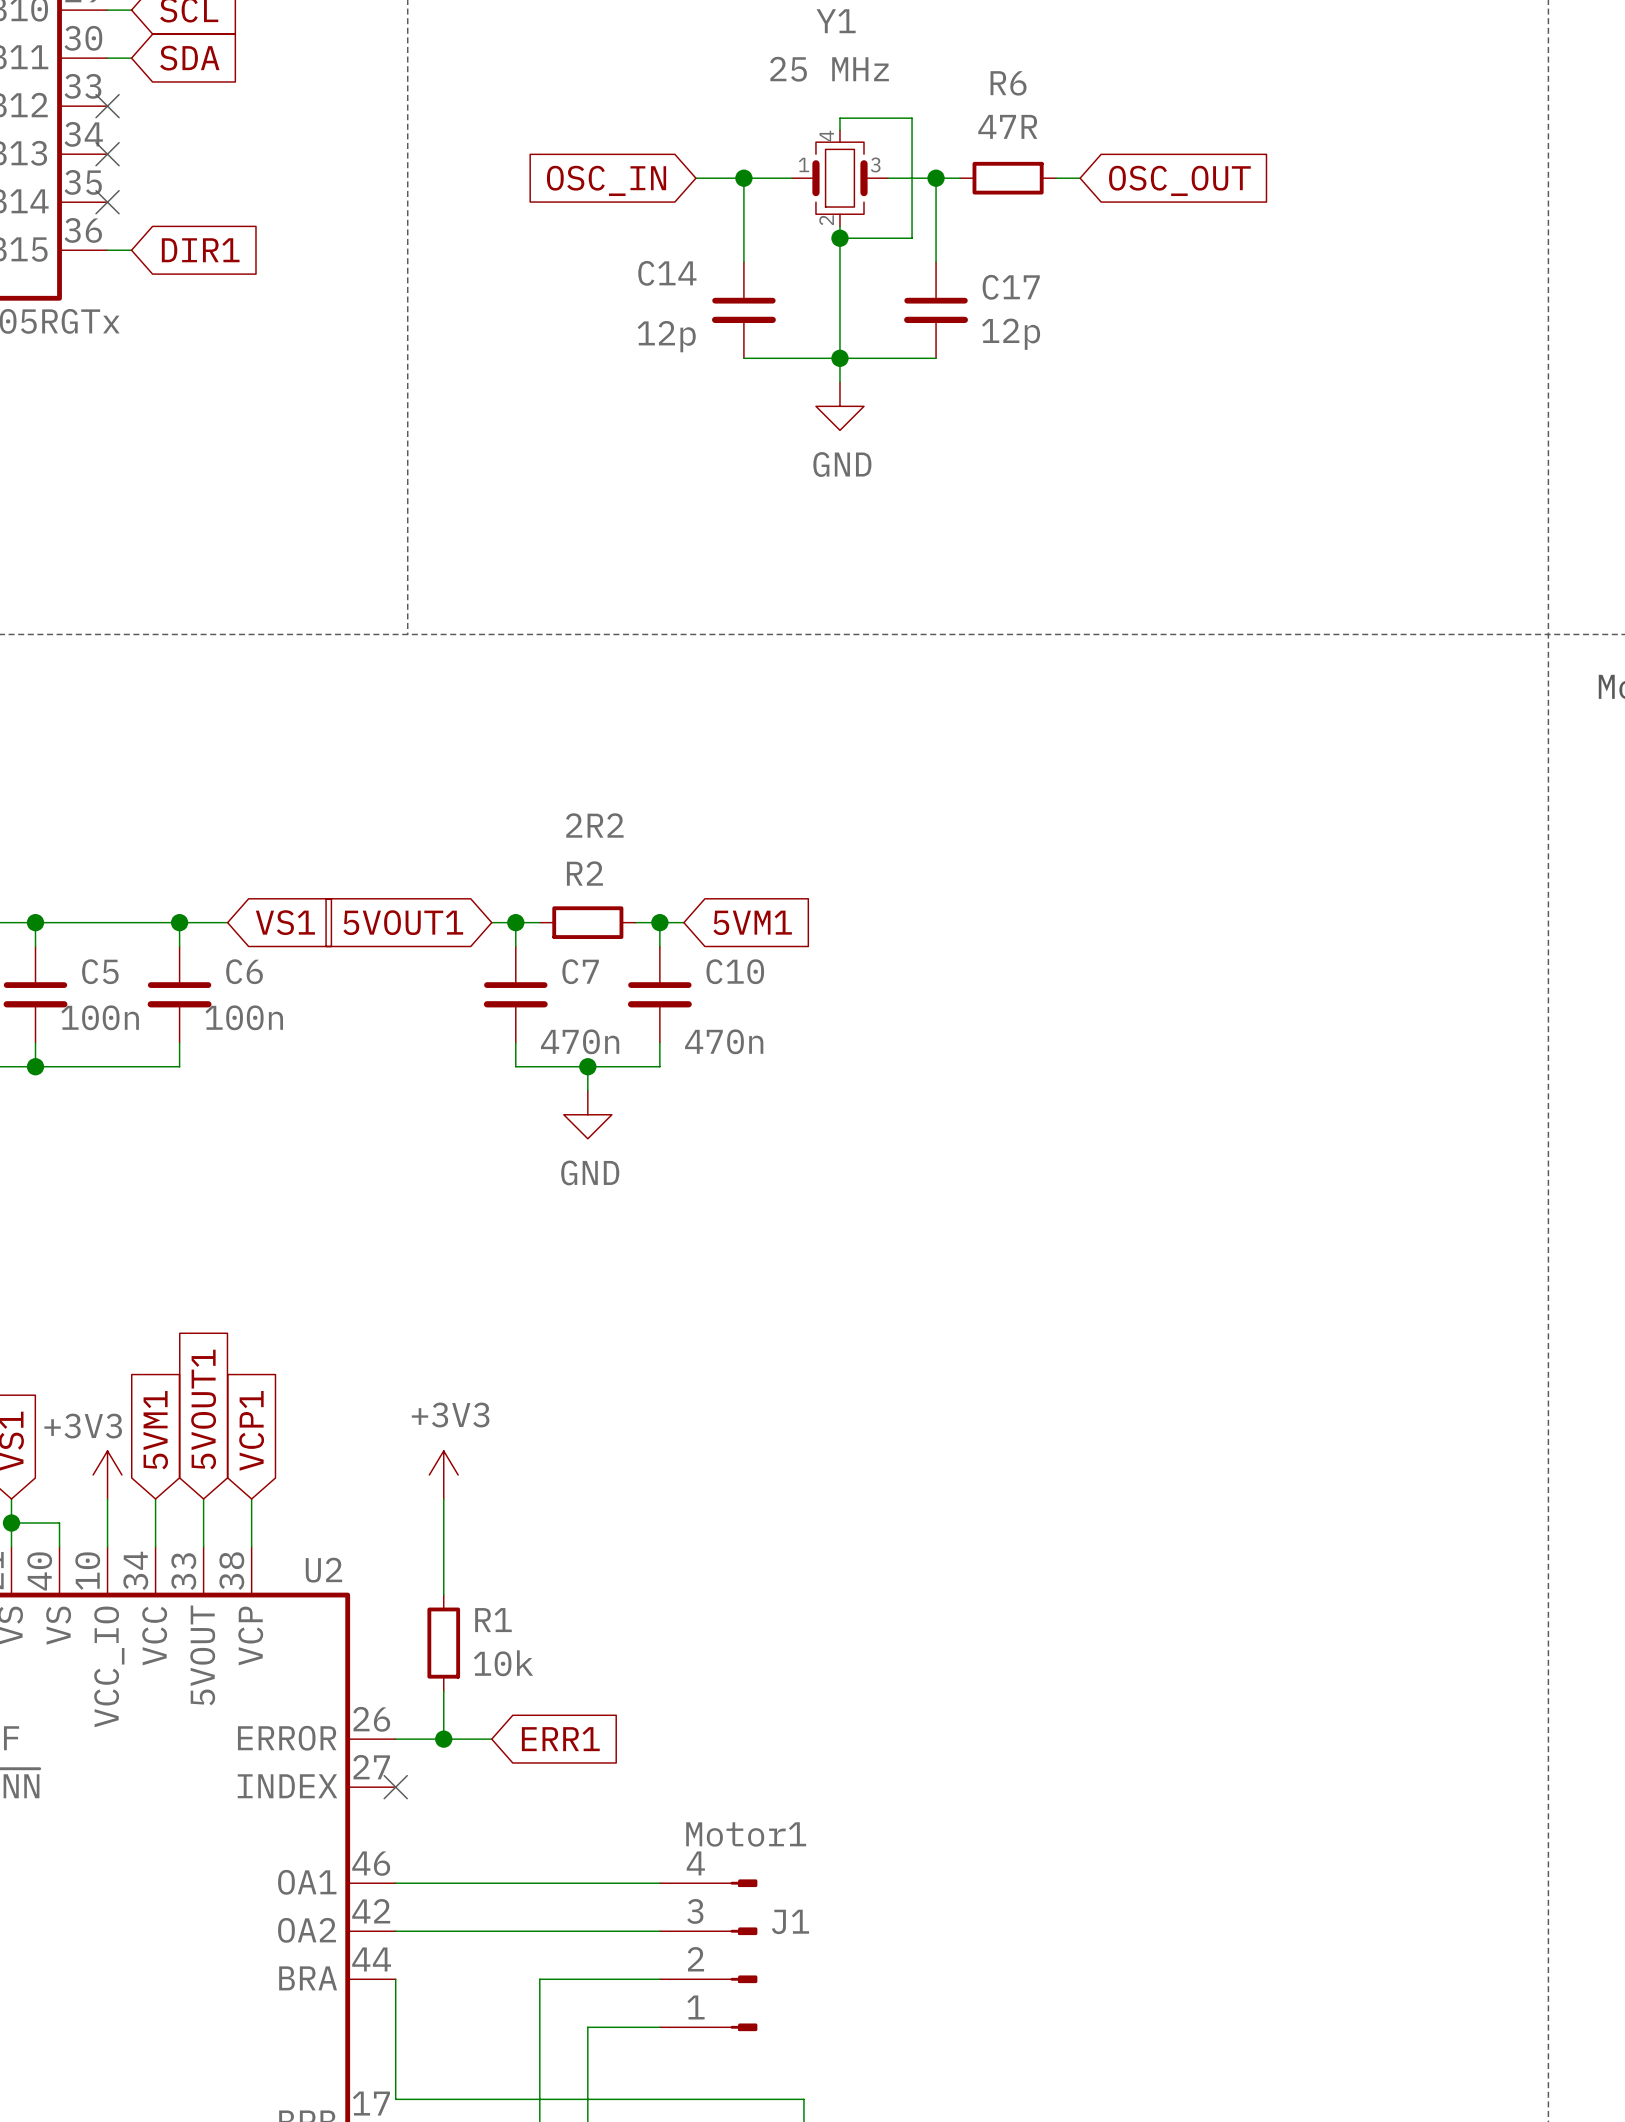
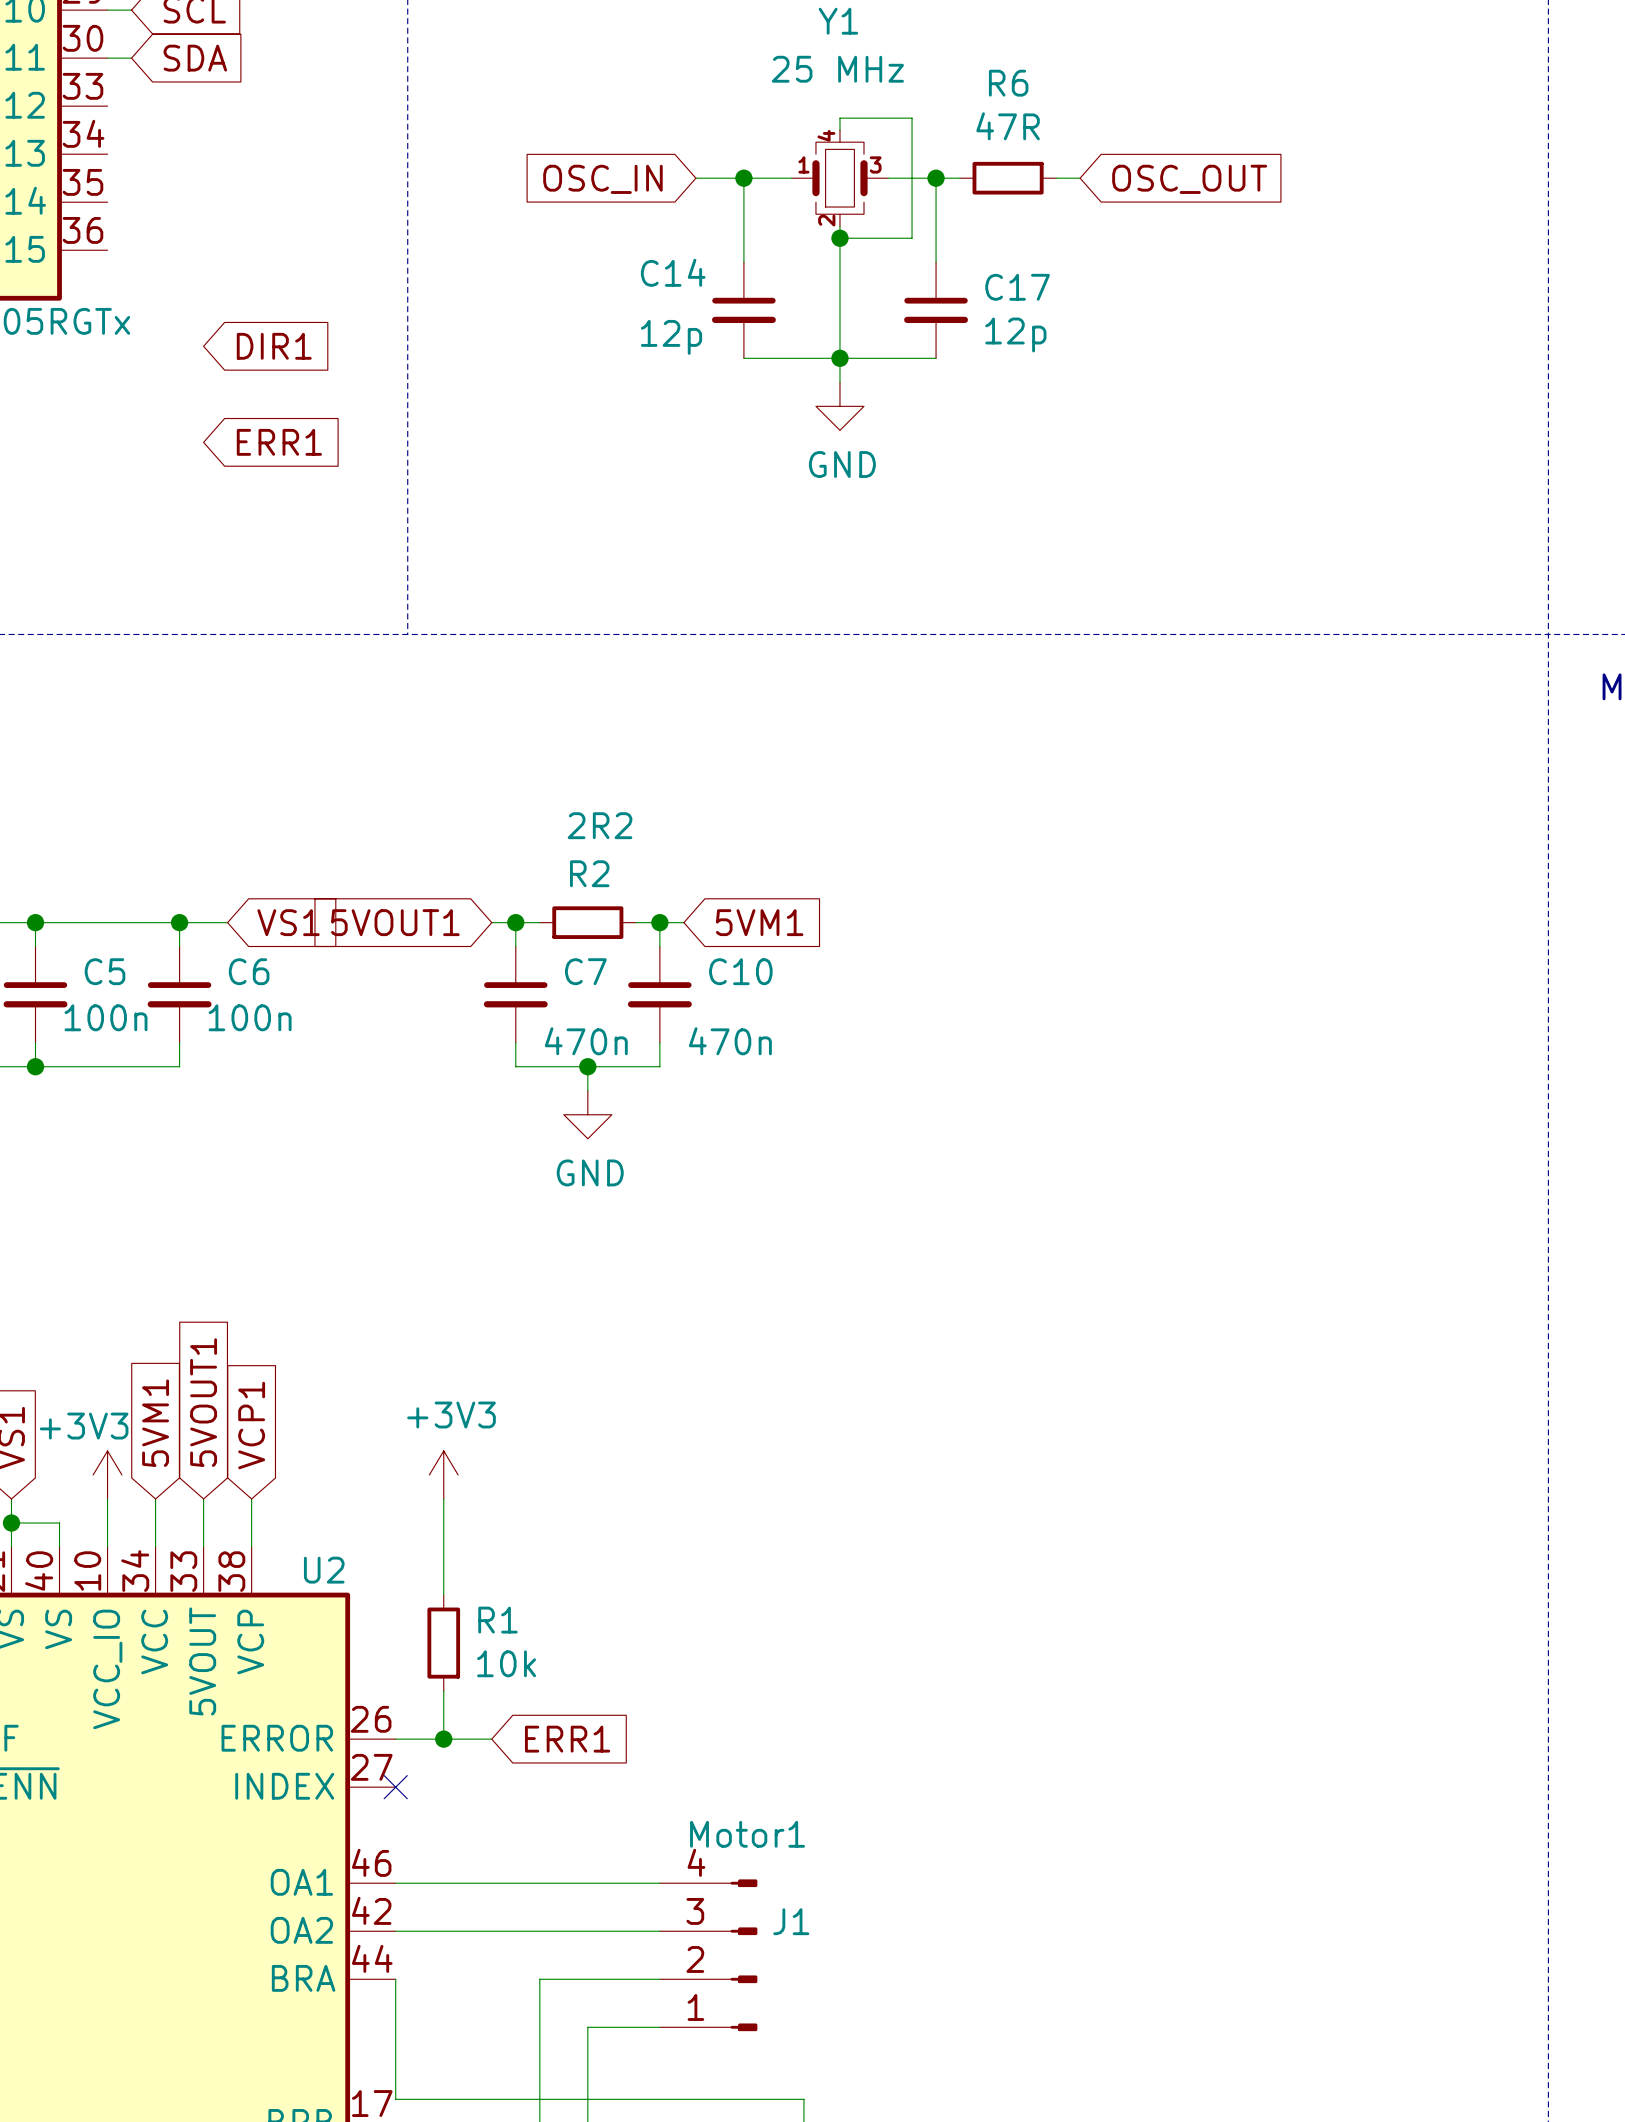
no-connect mark: (107, 106) -> none
no-connect mark: (107, 154) -> none
no-connect mark: (107, 202) -> none
wire: (107, 250) (131, 250) -> none
global label position: DIR1 (200, 250) -> DIR1 (274, 346)
global label: none -> ERR1 (279, 442)

